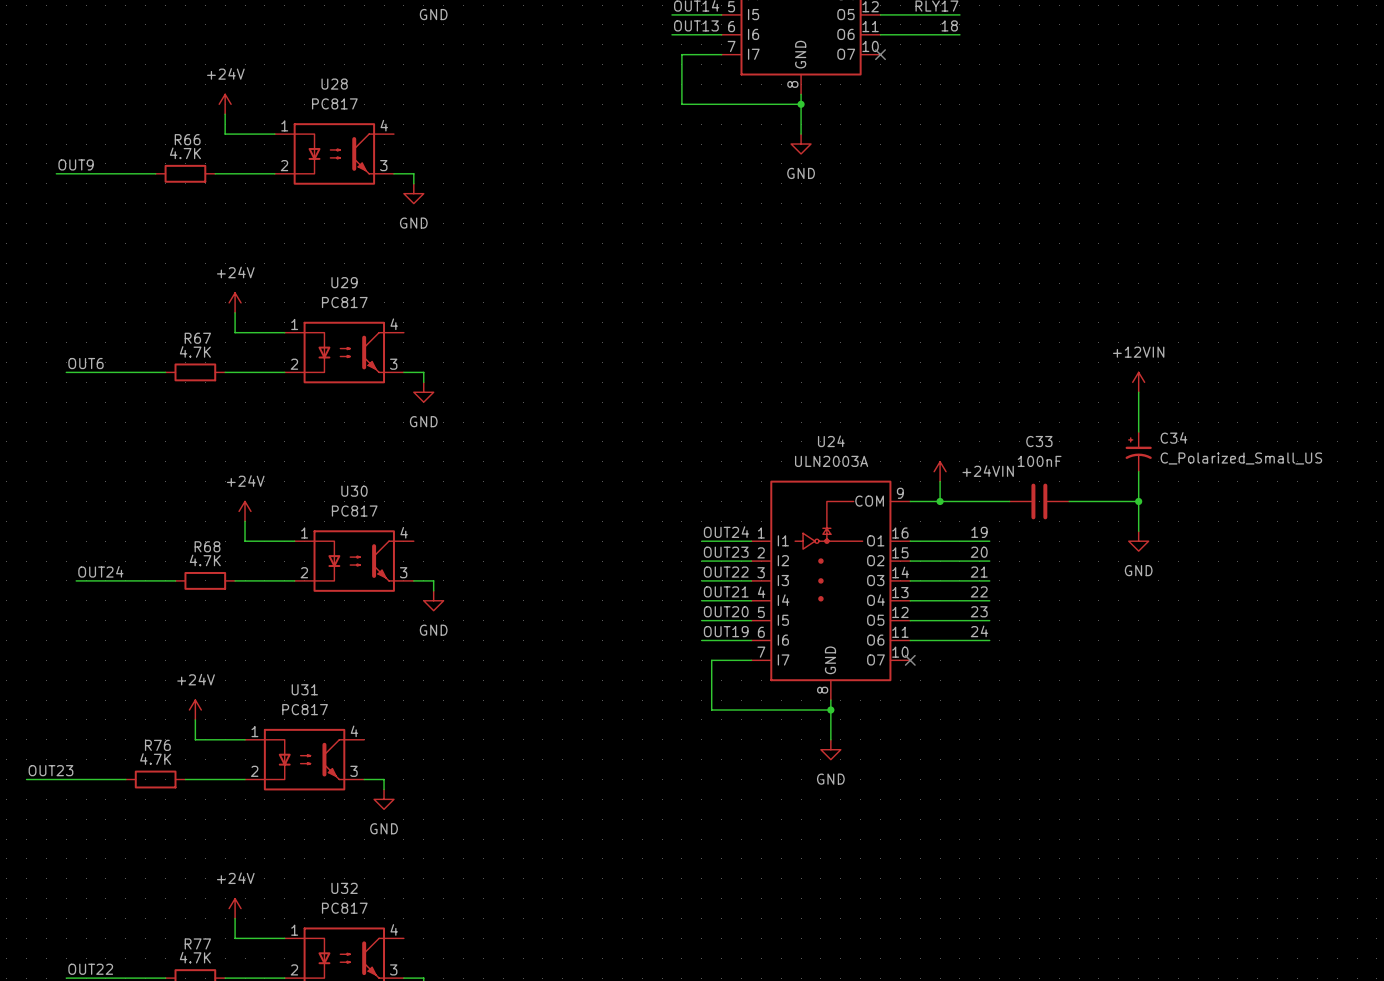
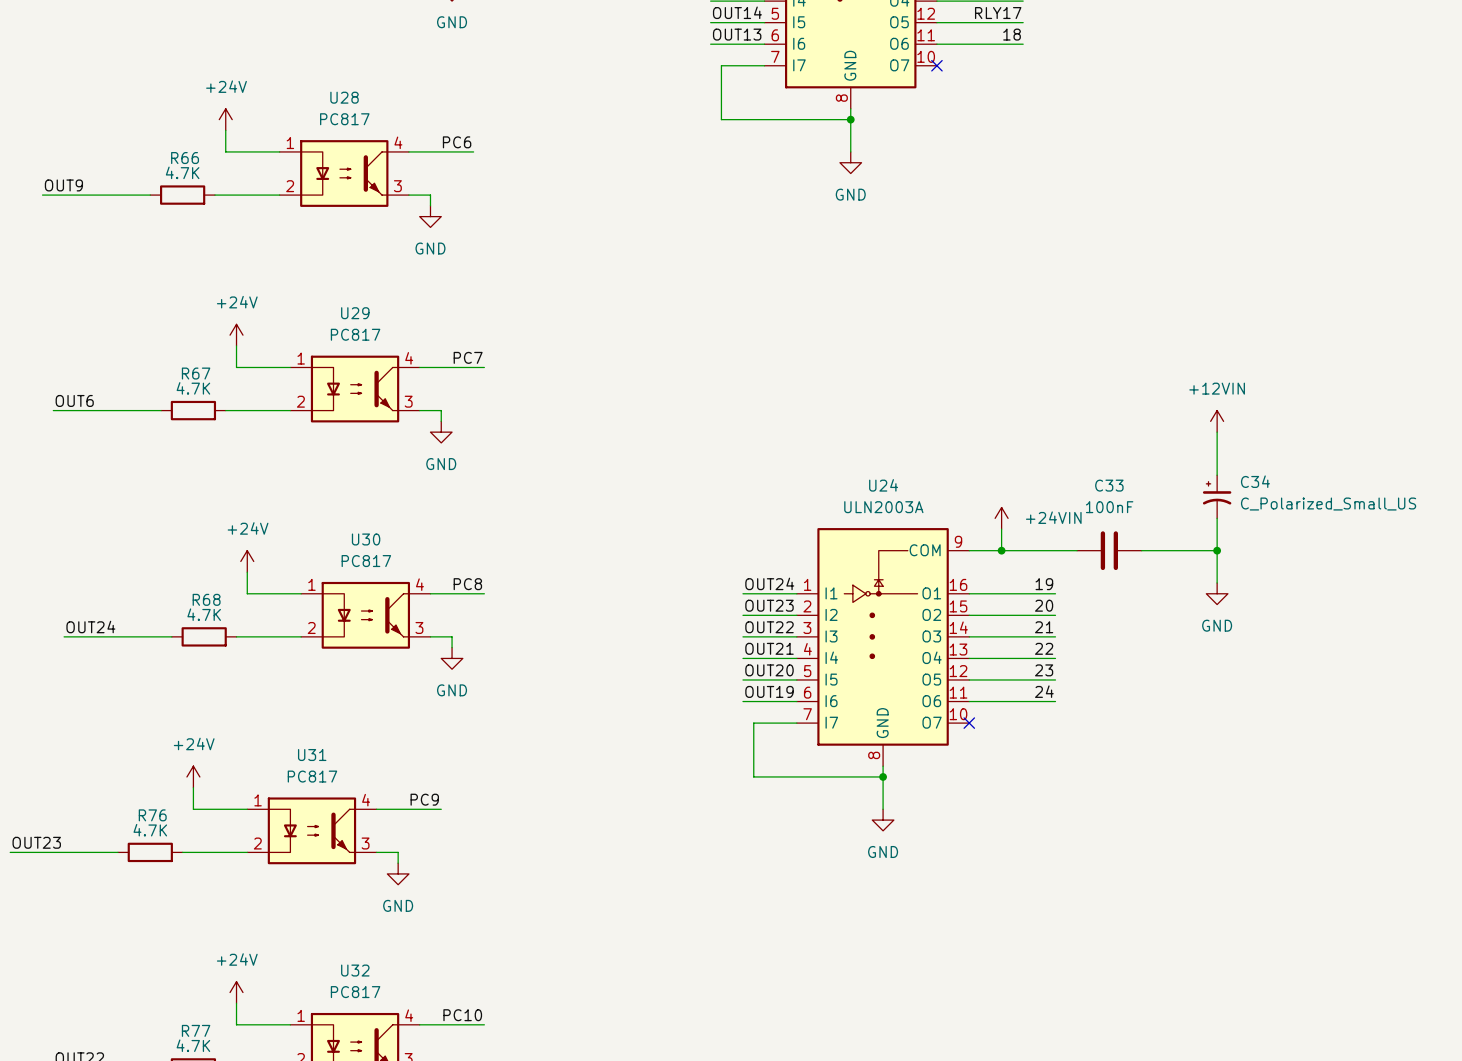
label: none -> PC6 (457, 142)
wire: none -> (408, 151) (473, 151)
label: none -> PC7 (468, 357)
wire: none -> (419, 367) (484, 367)
label: none -> PC8 (467, 584)
wire: none -> (430, 593) (484, 593)
label: none -> PC9 (424, 799)
wire: none -> (376, 809) (441, 809)
label: none -> PC10 (462, 1015)
wire: none -> (419, 1024) (484, 1024)

